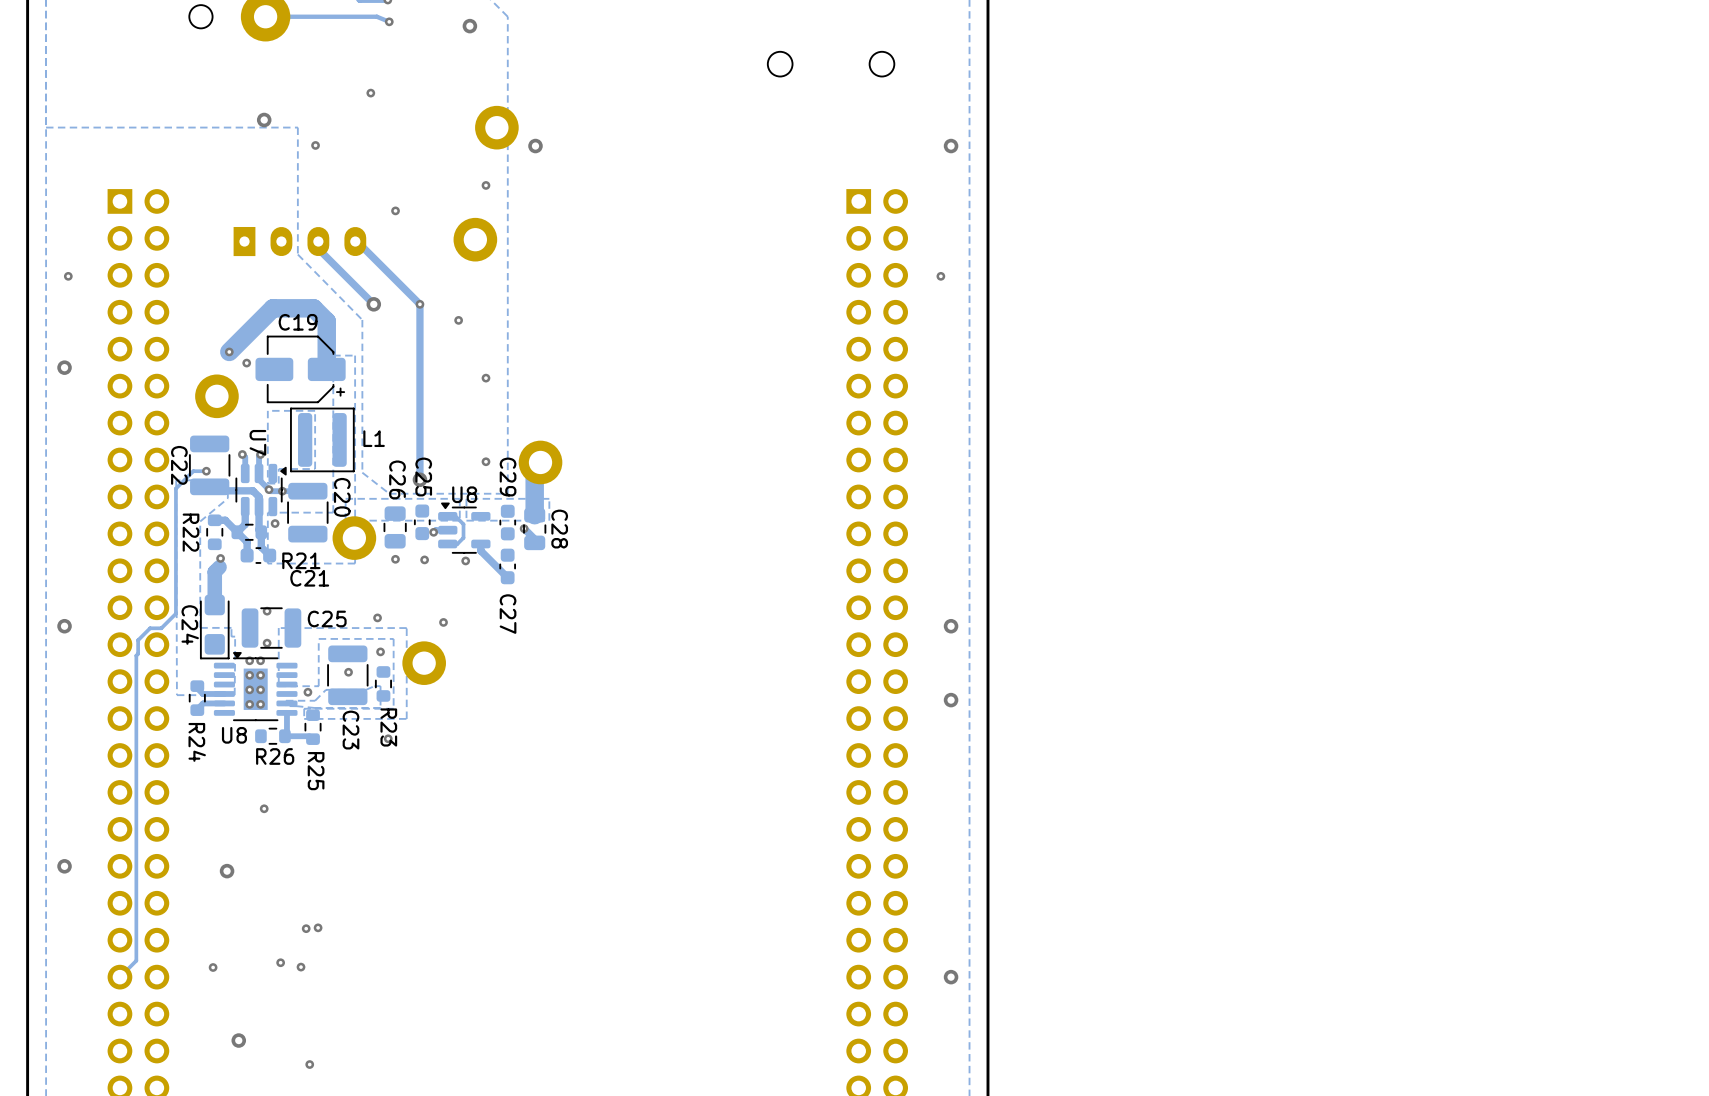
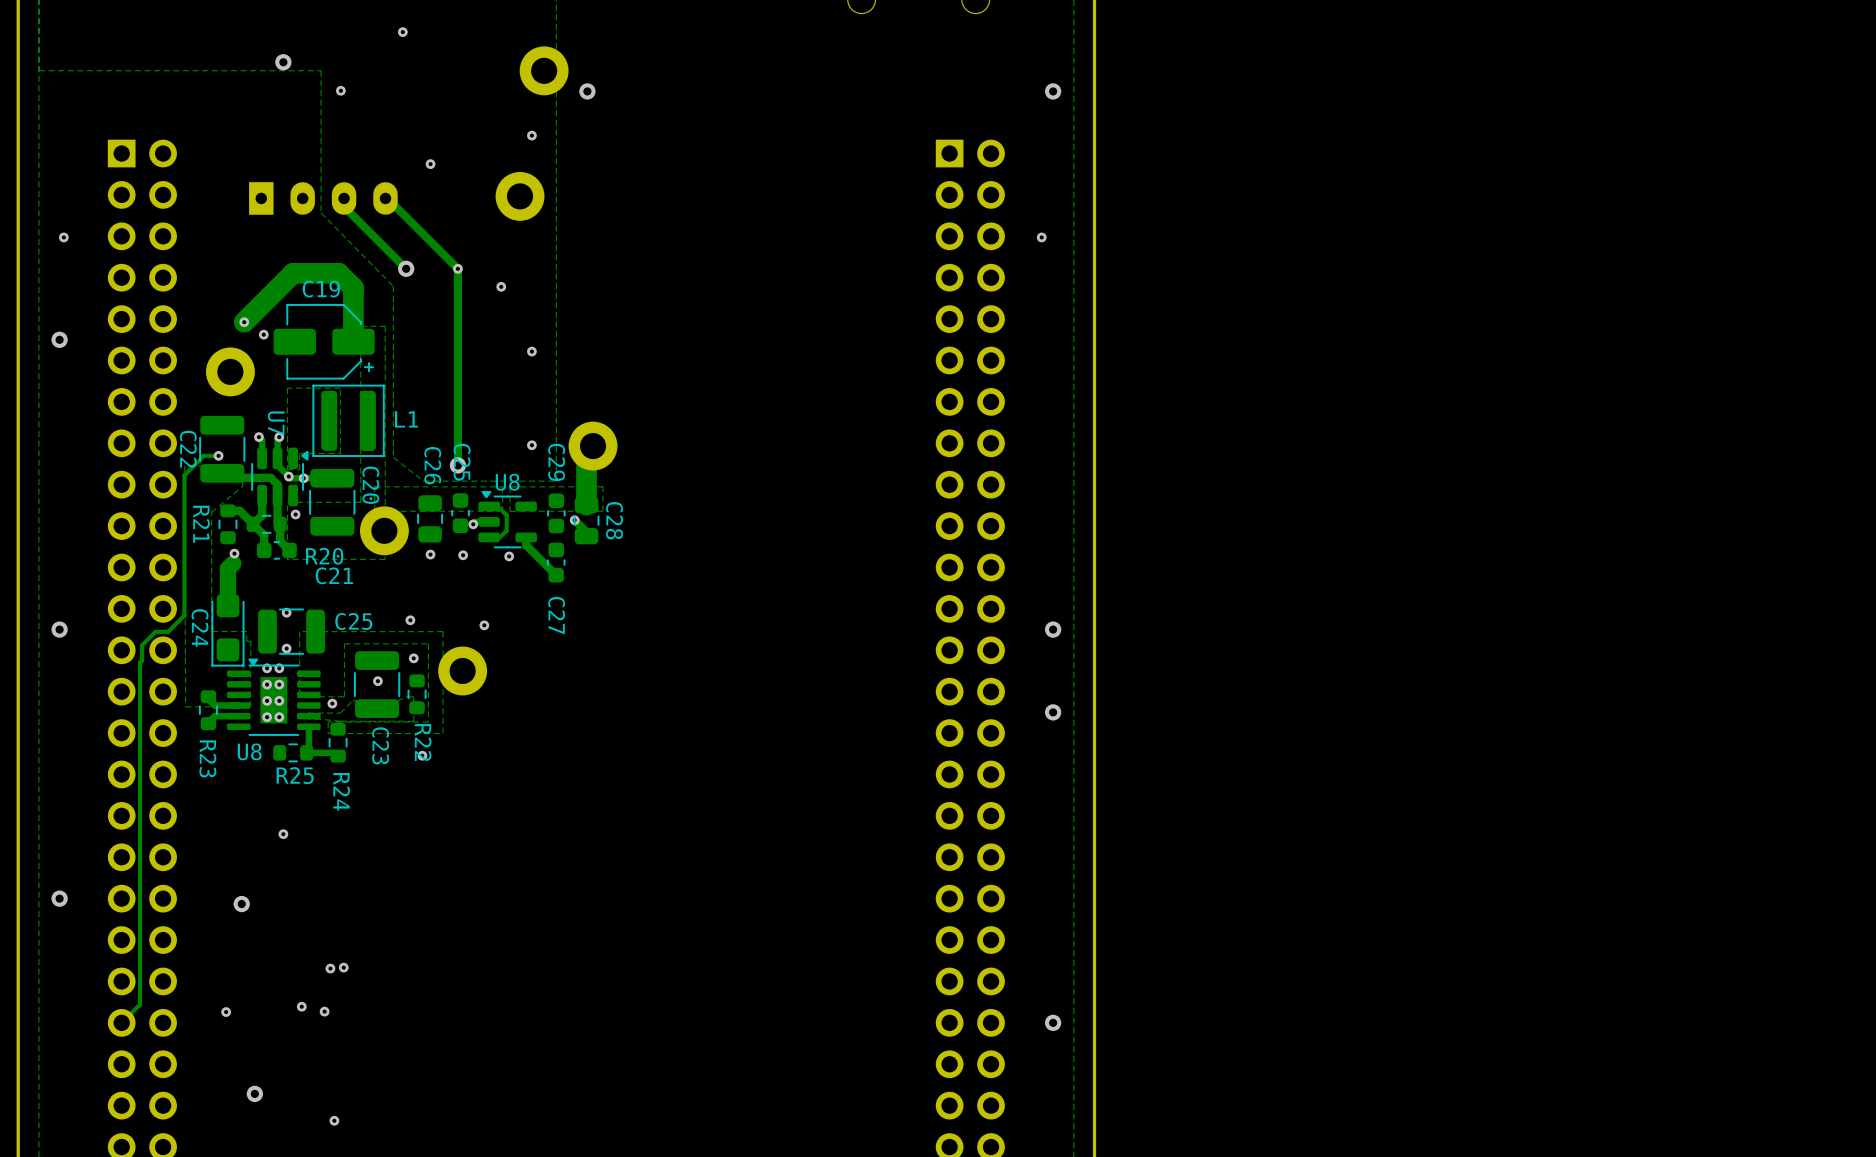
R22 name: R22 (191, 532) -> R21 (201, 524)
R21 name: R21 (301, 560) -> R20 (324, 556)
R23 name: R23 (388, 727) -> R22 (423, 742)
R24 name: R24 (197, 742) -> R23 (207, 758)
R26 name: R26 (275, 756) -> R25 (295, 775)
R25 name: R25 (316, 771) -> R24 (341, 791)

